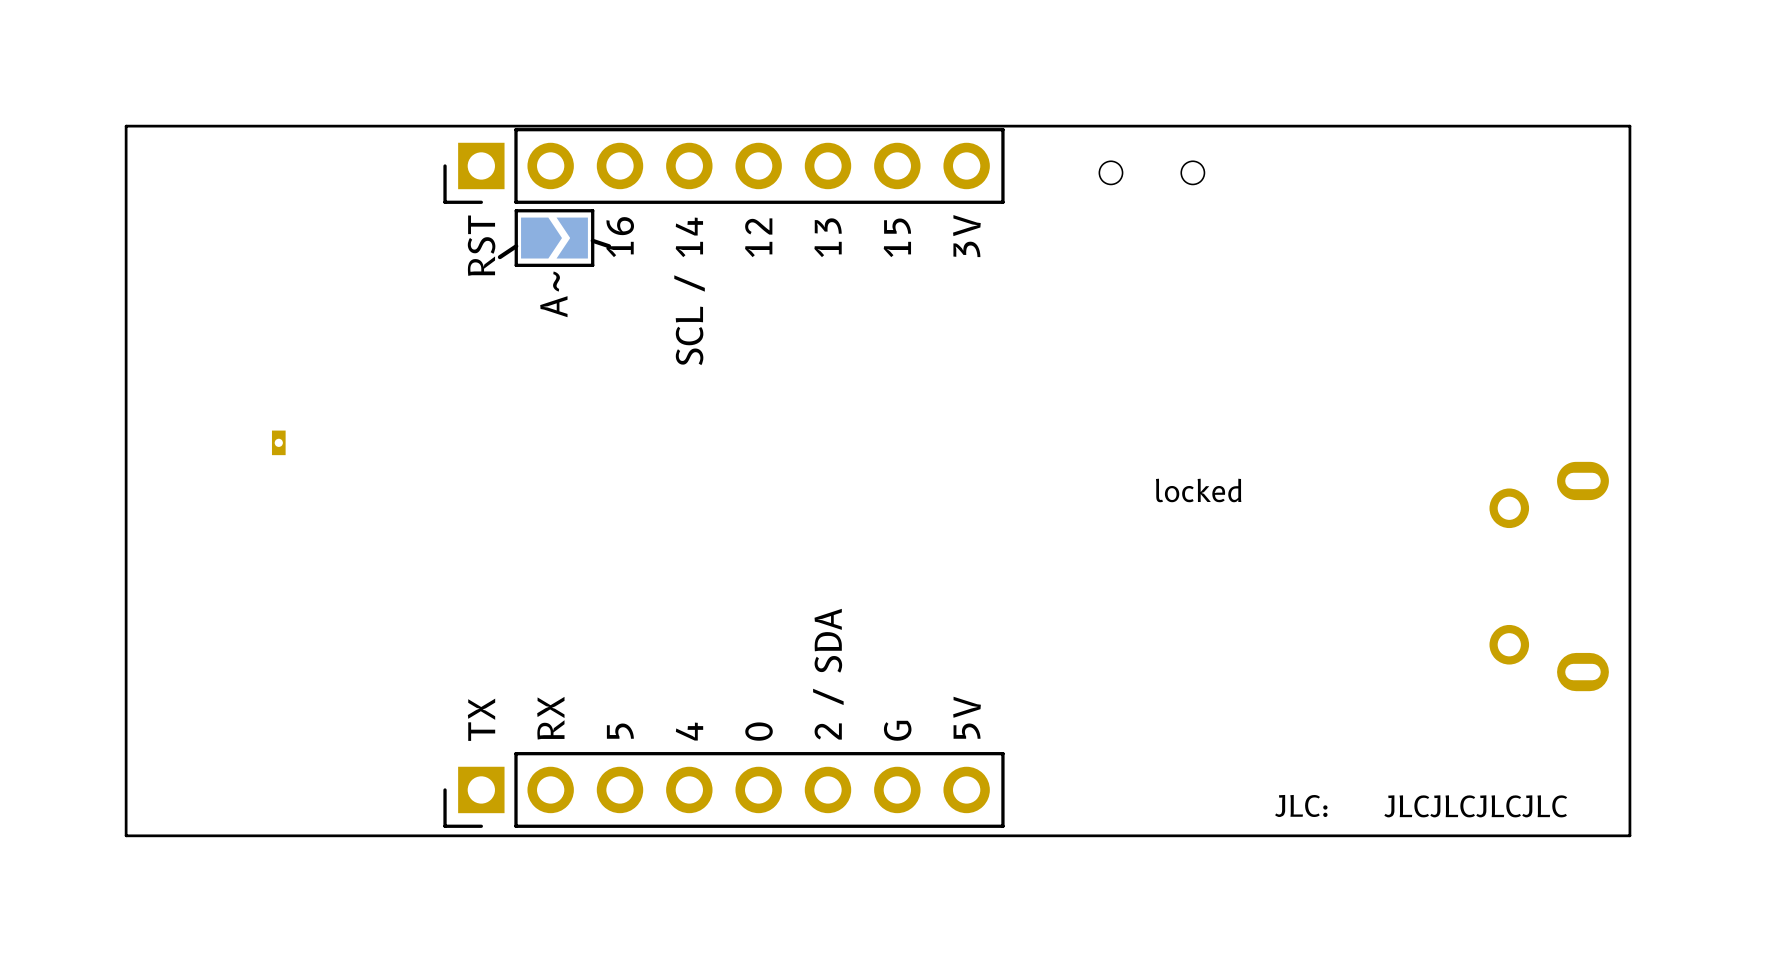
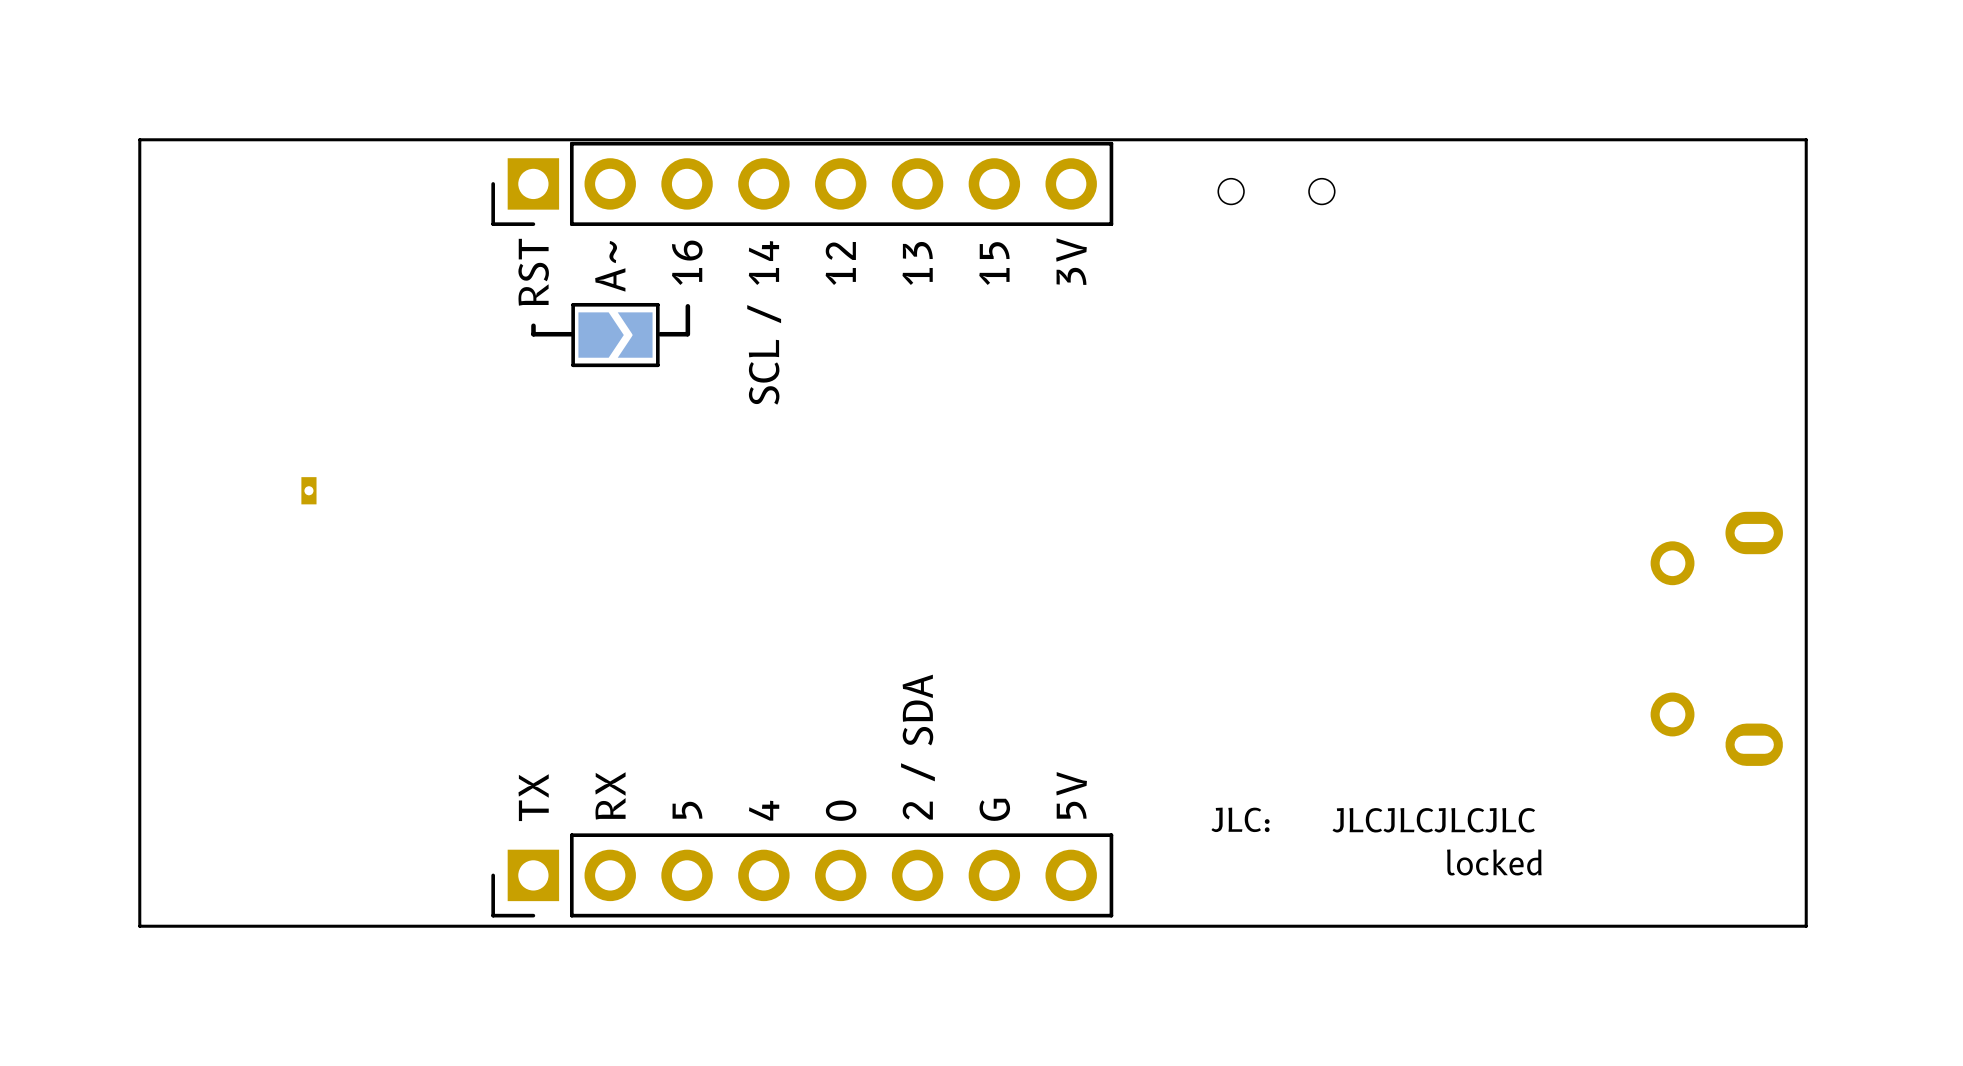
part position: (554, 238) -> (615, 335)
line: (592, 240) (609, 246) -> none
line: (516, 246) (499, 257) -> none
line: none -> (687, 306) (687, 334)
line: none -> (533, 325) (533, 334) (571, 334)
text position: A~ (553, 294) -> A~ (610, 266)
line: none -> (687, 334) (660, 334)
drawing position: (1198, 490) -> (1494, 862)
text position: JLC: (1301, 805) -> JLC: (1240, 819)
text position: JLCJLCJLCJLC (1475, 806) -> JLCJLCJLCJLC (1433, 820)

